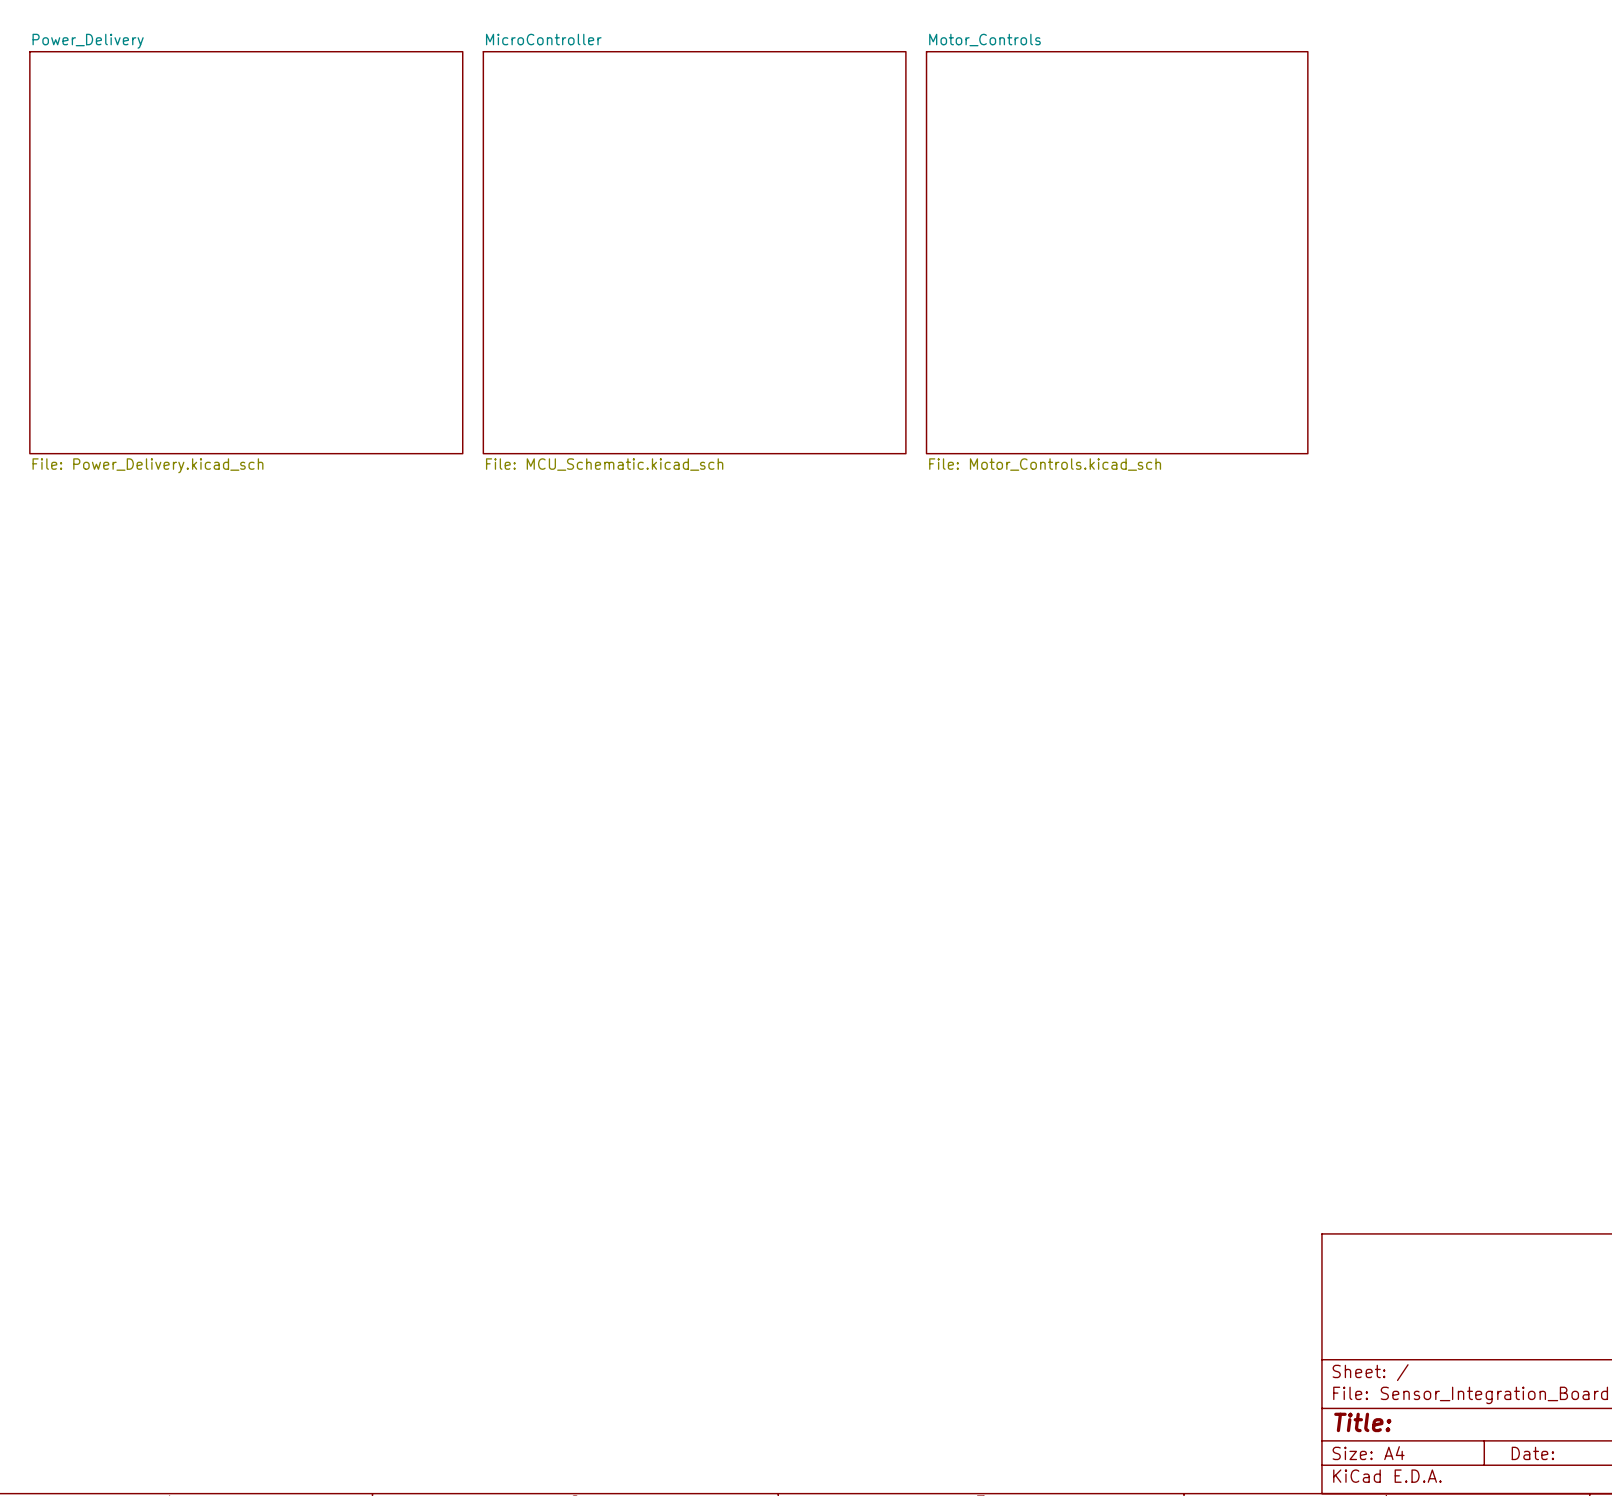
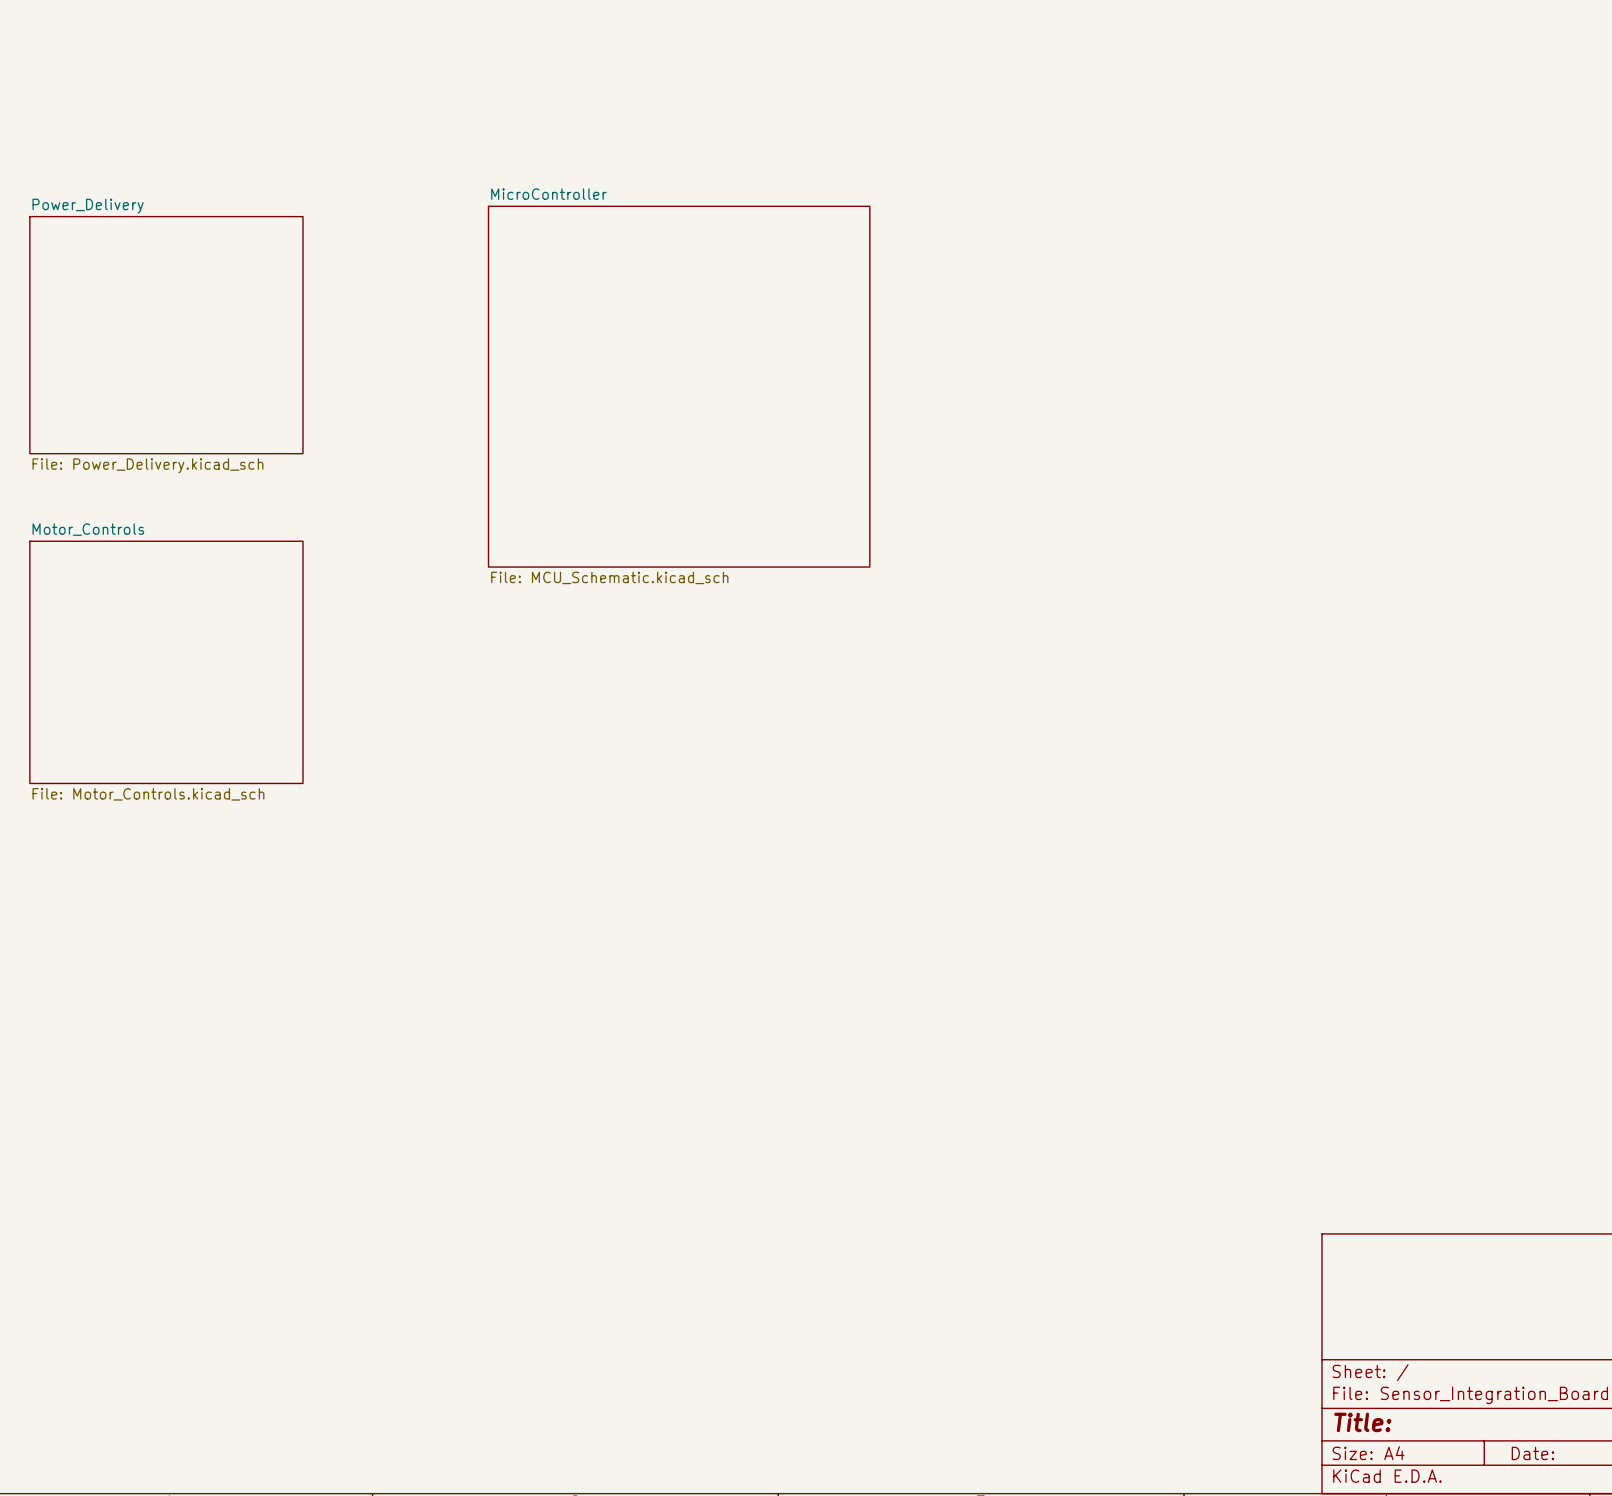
sheet Power_Delivery: File: Power_Delivery.kicad_sch (246, 252) -> none
sheet MicroController: File: MCU_Schematic.kicad_sch (694, 252) -> none
sheet Motor_Controls: File: Motor_Controls.kicad_sch (1117, 252) -> none
sheet Power_Delivery: none -> File: Power_Delivery.kicad_sch (166, 335)
sheet MicroController: none -> File: MCU_Schematic.kicad_sch (679, 386)
sheet Motor_Controls: none -> File: Motor_Controls.kicad_sch (166, 662)

